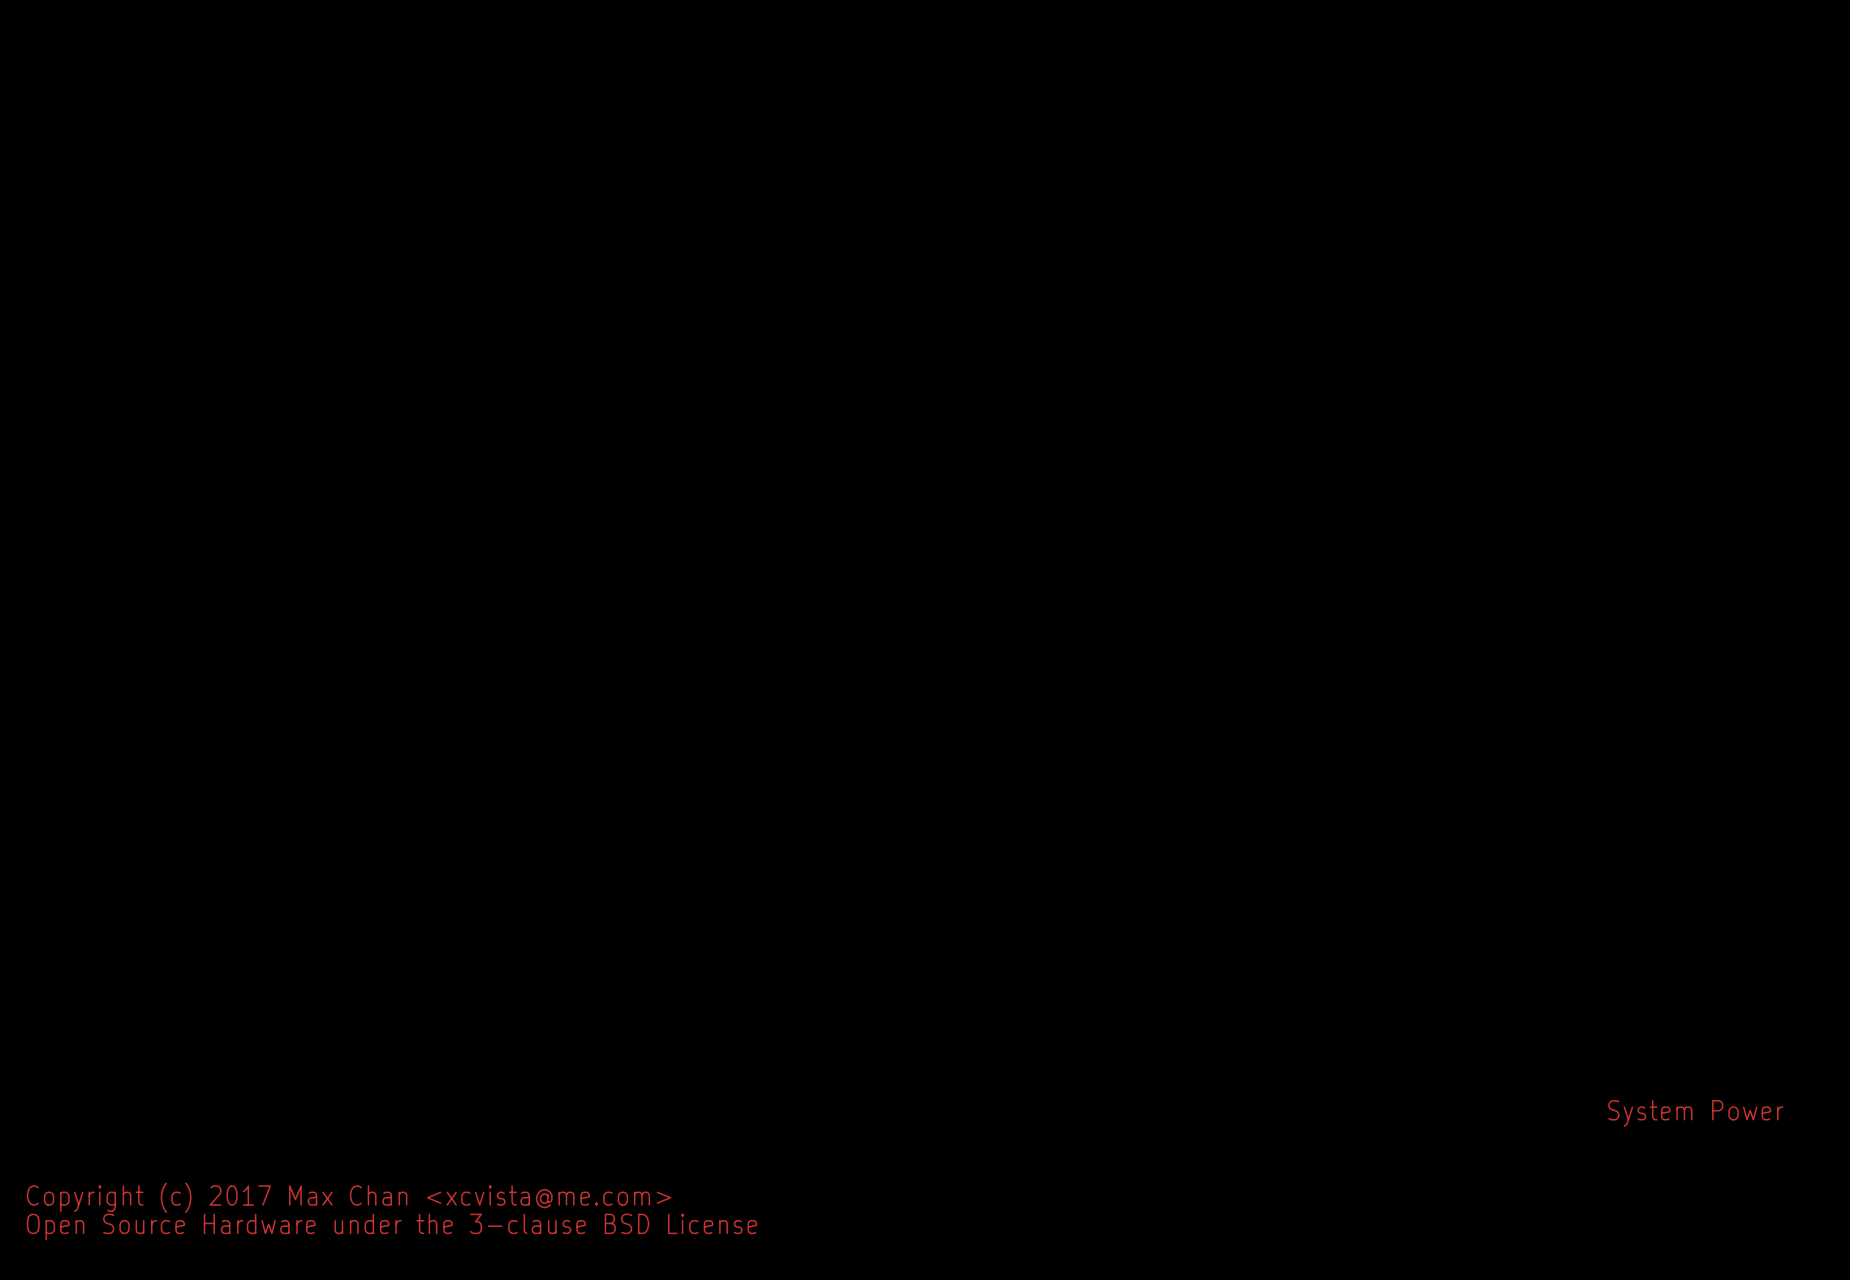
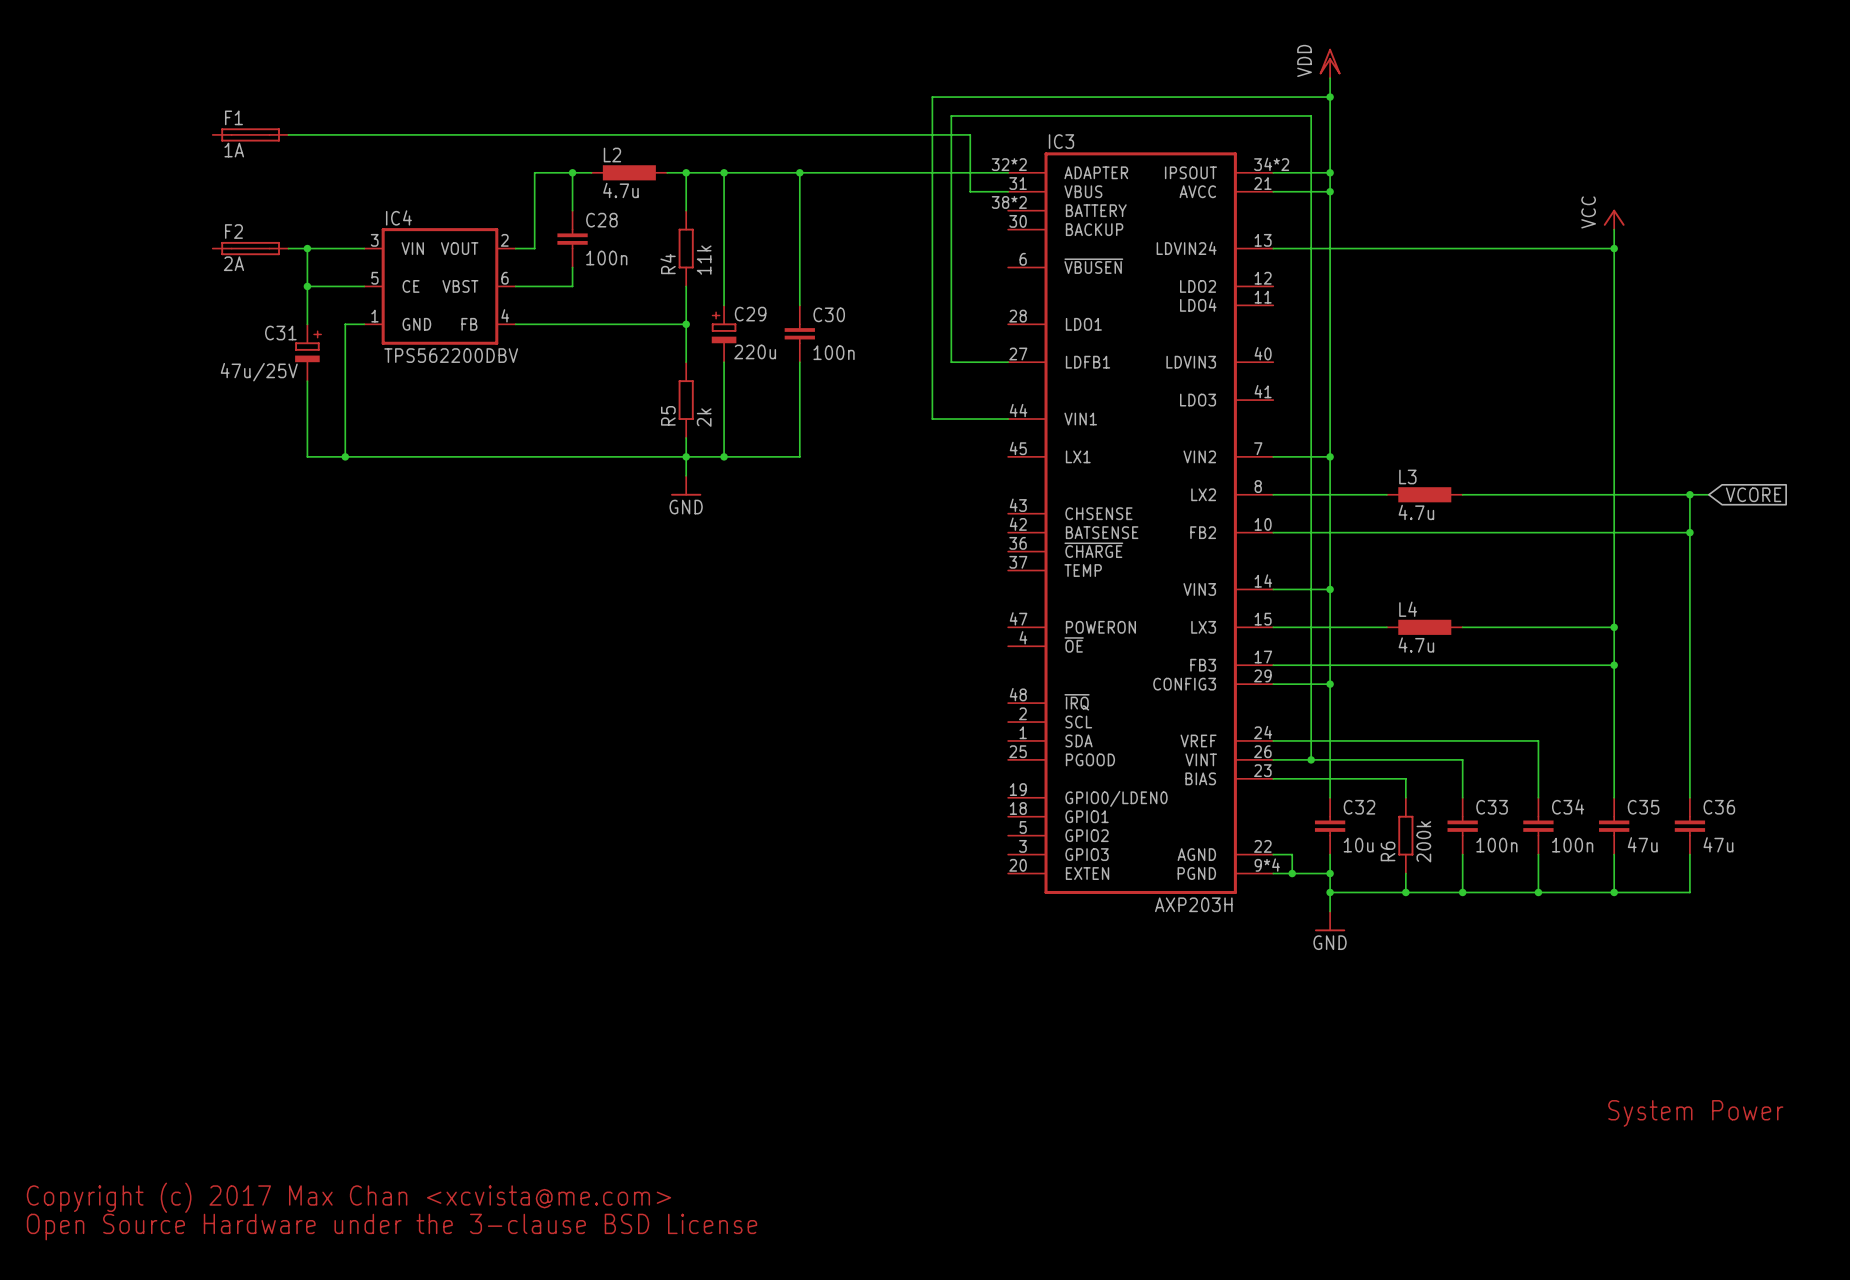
power symbol: none -> VDD (1330, 63)
wire: none -> (1330, 78) (1330, 797)
wire: none -> (1330, 97) (932, 97) (932, 419) (1008, 419)
junction: none -> (1330, 97)
F1: none -> 1A (250, 134)
wire: none -> (288, 134) (970, 134) (970, 191) (1008, 191)
wire: none -> (572, 172) (572, 210)
junction: none -> (572, 172)
wire: none -> (591, 172) (534, 172) (534, 248) (515, 248)
L2: none -> 4.7u (629, 172)
wire: none -> (667, 172) (1008, 172)
wire: none -> (686, 172) (686, 210)
junction: none -> (686, 172)
wire: none -> (724, 172) (724, 305)
junction: none -> (724, 172)
wire: none -> (799, 172) (799, 305)
junction: none -> (799, 172)
wire: none -> (1273, 172) (1330, 172)
junction: none -> (1330, 172)
wire: none -> (1273, 191) (1330, 191)
junction: none -> (1330, 191)
power symbol: none -> VCC (1614, 219)
wire: none -> (1614, 229) (1614, 797)
C28: none -> 100n (572, 239)
F2: none -> 2A (250, 248)
wire: none -> (288, 248) (364, 248)
wire: none -> (307, 248) (307, 324)
junction: none -> (307, 248)
R4: none -> 11k (686, 248)
wire: none -> (1273, 248) (1614, 248)
junction: none -> (1614, 248)
wire: none -> (572, 267) (572, 286) (515, 286)
wire: none -> (307, 286) (364, 286)
junction: none -> (307, 286)
IC4: none -> TPS562200DBV (439, 286)
wire: none -> (686, 286) (686, 362)
wire: none -> (364, 324) (345, 324) (345, 456)
wire: none -> (515, 324) (686, 324)
junction: none -> (686, 324)
C29: none -> 220u (724, 333)
C30: none -> 100n (799, 333)
C31: none -> 47u/25V (307, 352)
wire: none -> (724, 362) (724, 456)
wire: none -> (799, 362) (799, 456) (307, 456) (307, 381)
wire: none -> (1008, 362) (951, 362) (951, 115) (1311, 115) (1311, 759)
R5: none -> 2k (686, 400)
wire: none -> (686, 437) (686, 475)
junction: none -> (345, 456)
junction: none -> (686, 456)
junction: none -> (724, 456)
wire: none -> (1273, 456) (1330, 456)
junction: none -> (1330, 456)
power symbol: none -> GND (686, 485)
wire: none -> (1273, 494) (1386, 494)
L3: none -> 4.7u (1424, 494)
wire: none -> (1462, 494) (1708, 494)
wire: none -> (1689, 494) (1689, 797)
junction: none -> (1689, 494)
global label: none -> VCORE (1753, 494)
IC3: none -> AXP203H (1140, 523)
wire: none -> (1273, 532) (1689, 532)
junction: none -> (1689, 532)
wire: none -> (1273, 589) (1330, 589)
junction: none -> (1330, 589)
wire: none -> (1273, 627) (1386, 627)
L4: none -> 4.7u (1424, 627)
wire: none -> (1462, 627) (1614, 627)
junction: none -> (1614, 627)
wire: none -> (1273, 665) (1614, 665)
junction: none -> (1614, 665)
wire: none -> (1273, 684) (1330, 684)
junction: none -> (1330, 684)
wire: none -> (1273, 740) (1538, 740) (1538, 797)
wire: none -> (1273, 759) (1462, 759) (1462, 797)
junction: none -> (1311, 759)
wire: none -> (1273, 778) (1405, 778) (1405, 797)
C32: none -> 10u (1330, 826)
C33: none -> 100n (1462, 826)
C34: none -> 100n (1538, 826)
C35: none -> 47u (1614, 826)
C36: none -> 47u (1689, 826)
R6: none -> 200k (1405, 835)
wire: none -> (1273, 854) (1292, 854) (1292, 873)
wire: none -> (1330, 854) (1330, 911)
wire: none -> (1462, 854) (1462, 892)
wire: none -> (1538, 854) (1538, 892)
wire: none -> (1614, 854) (1614, 892)
wire: none -> (1689, 854) (1689, 892) (1330, 892)
wire: none -> (1273, 873) (1330, 873)
junction: none -> (1292, 873)
junction: none -> (1330, 873)
wire: none -> (1405, 873) (1405, 892)
junction: none -> (1330, 892)
junction: none -> (1405, 892)
junction: none -> (1462, 892)
junction: none -> (1538, 892)
junction: none -> (1614, 892)
power symbol: none -> GND (1330, 921)

